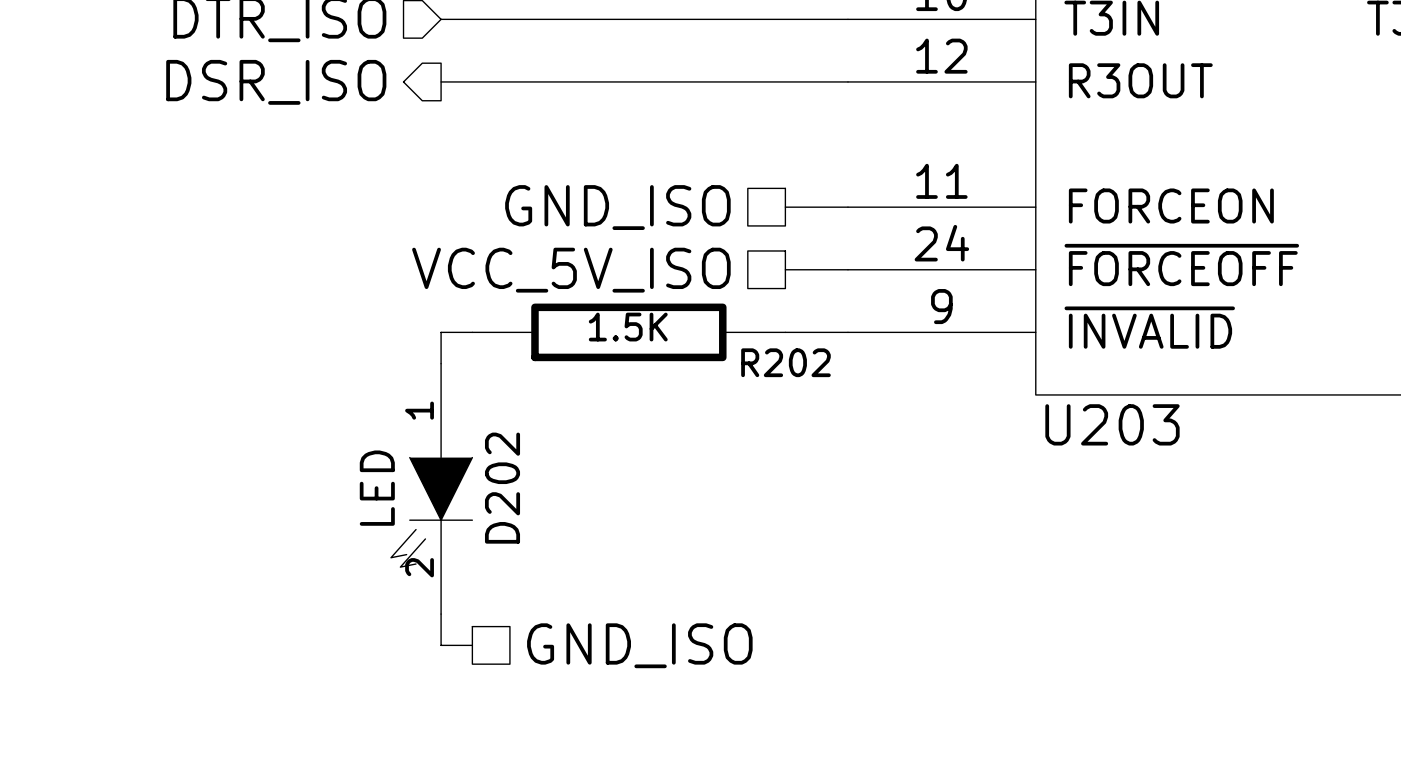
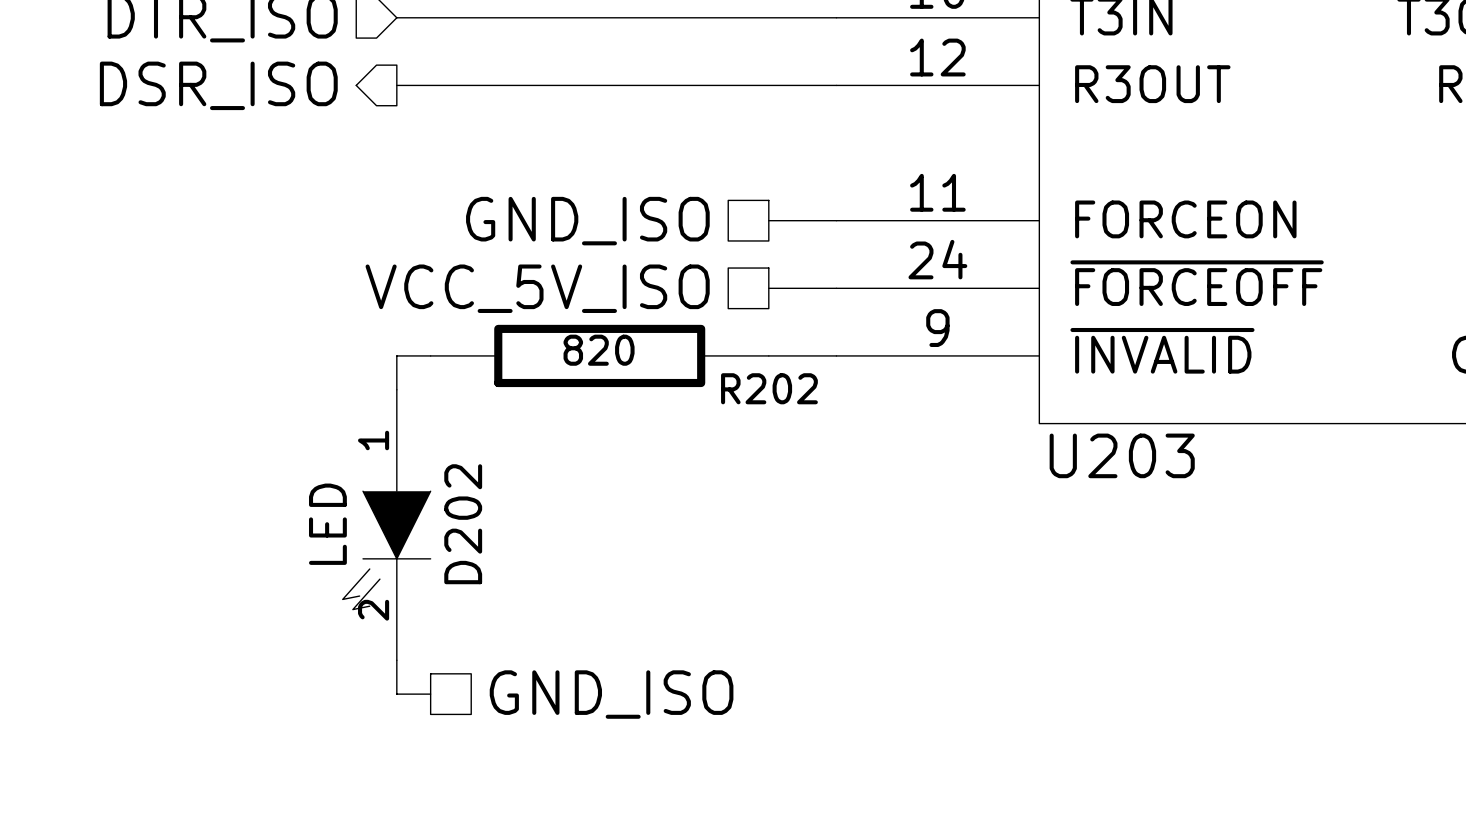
R202 value: 1.5K (628, 327) -> 820 (599, 350)

